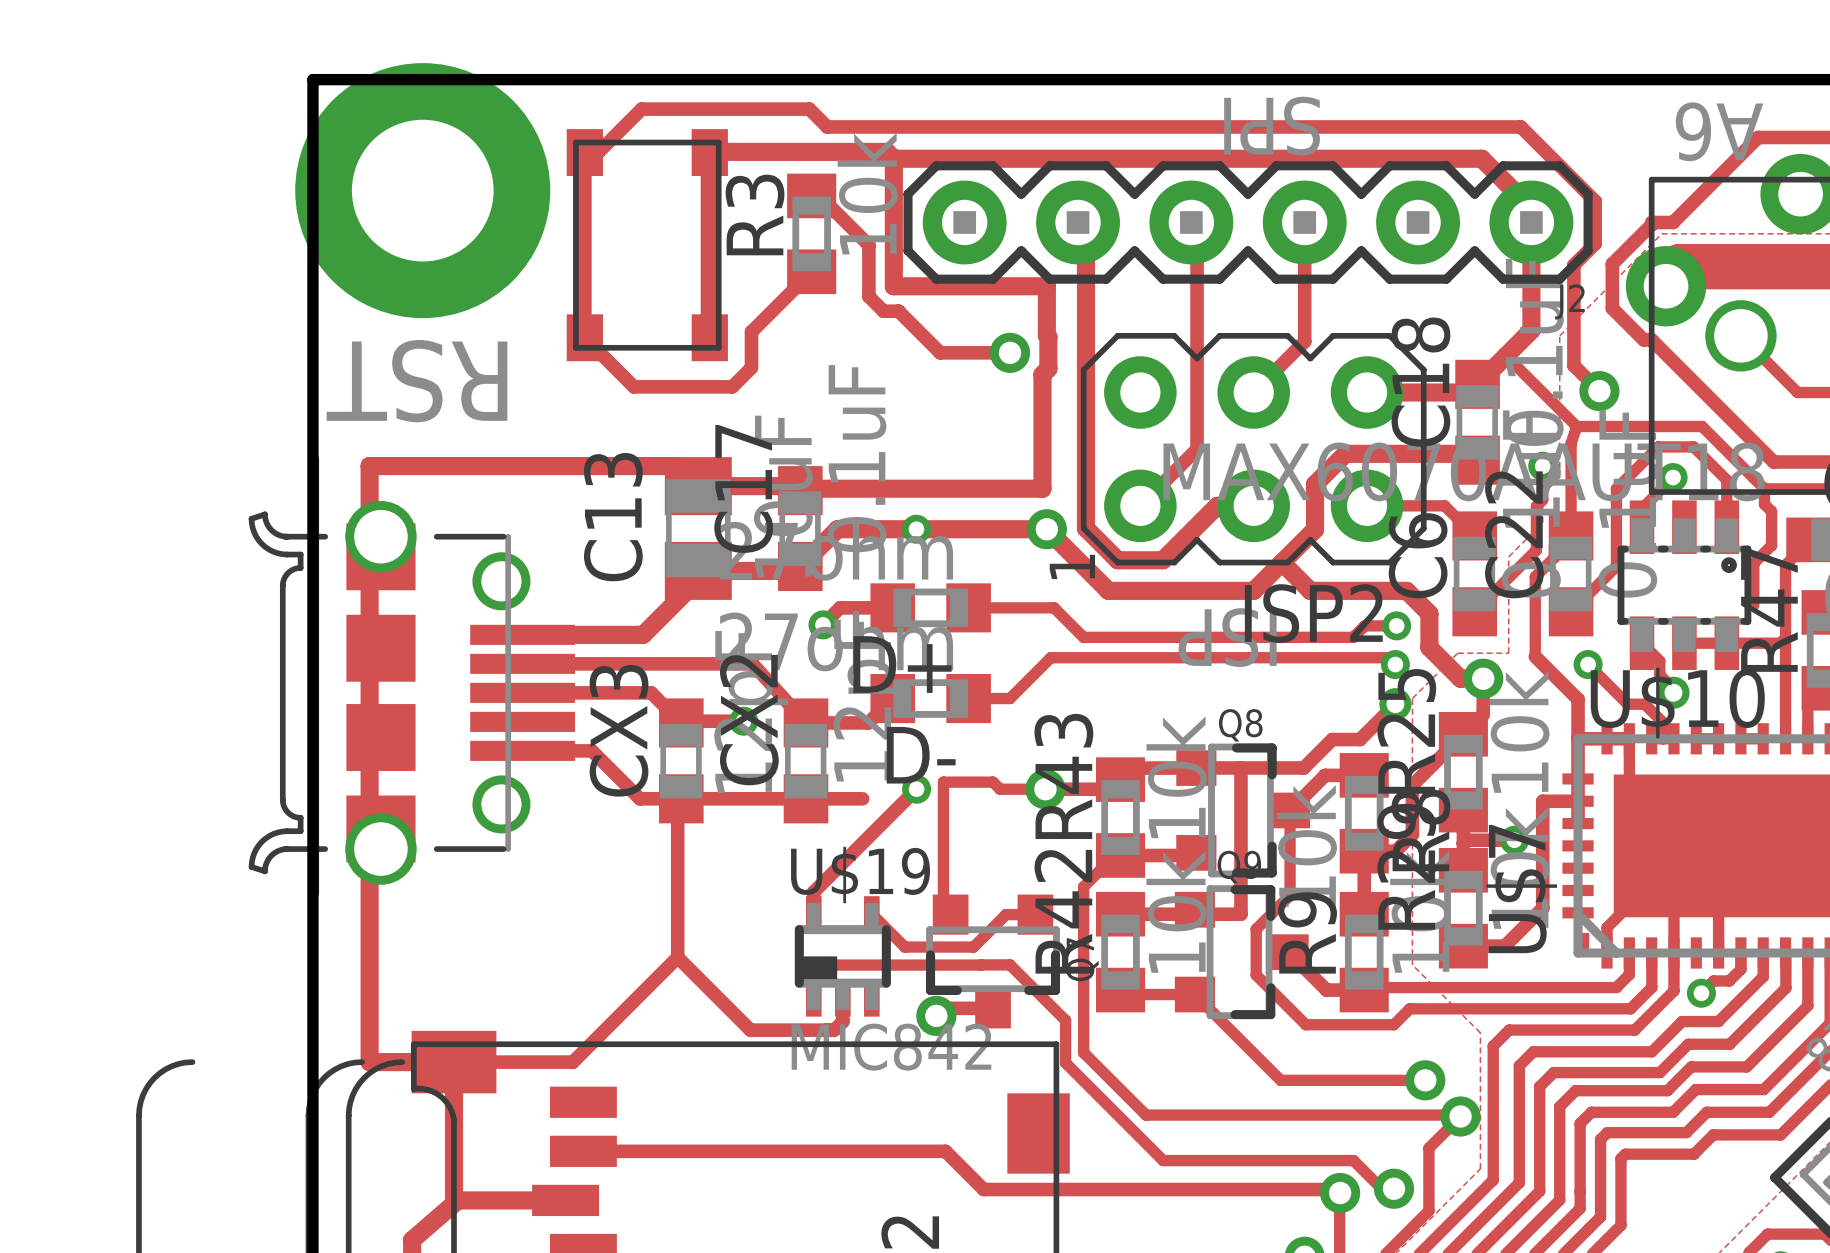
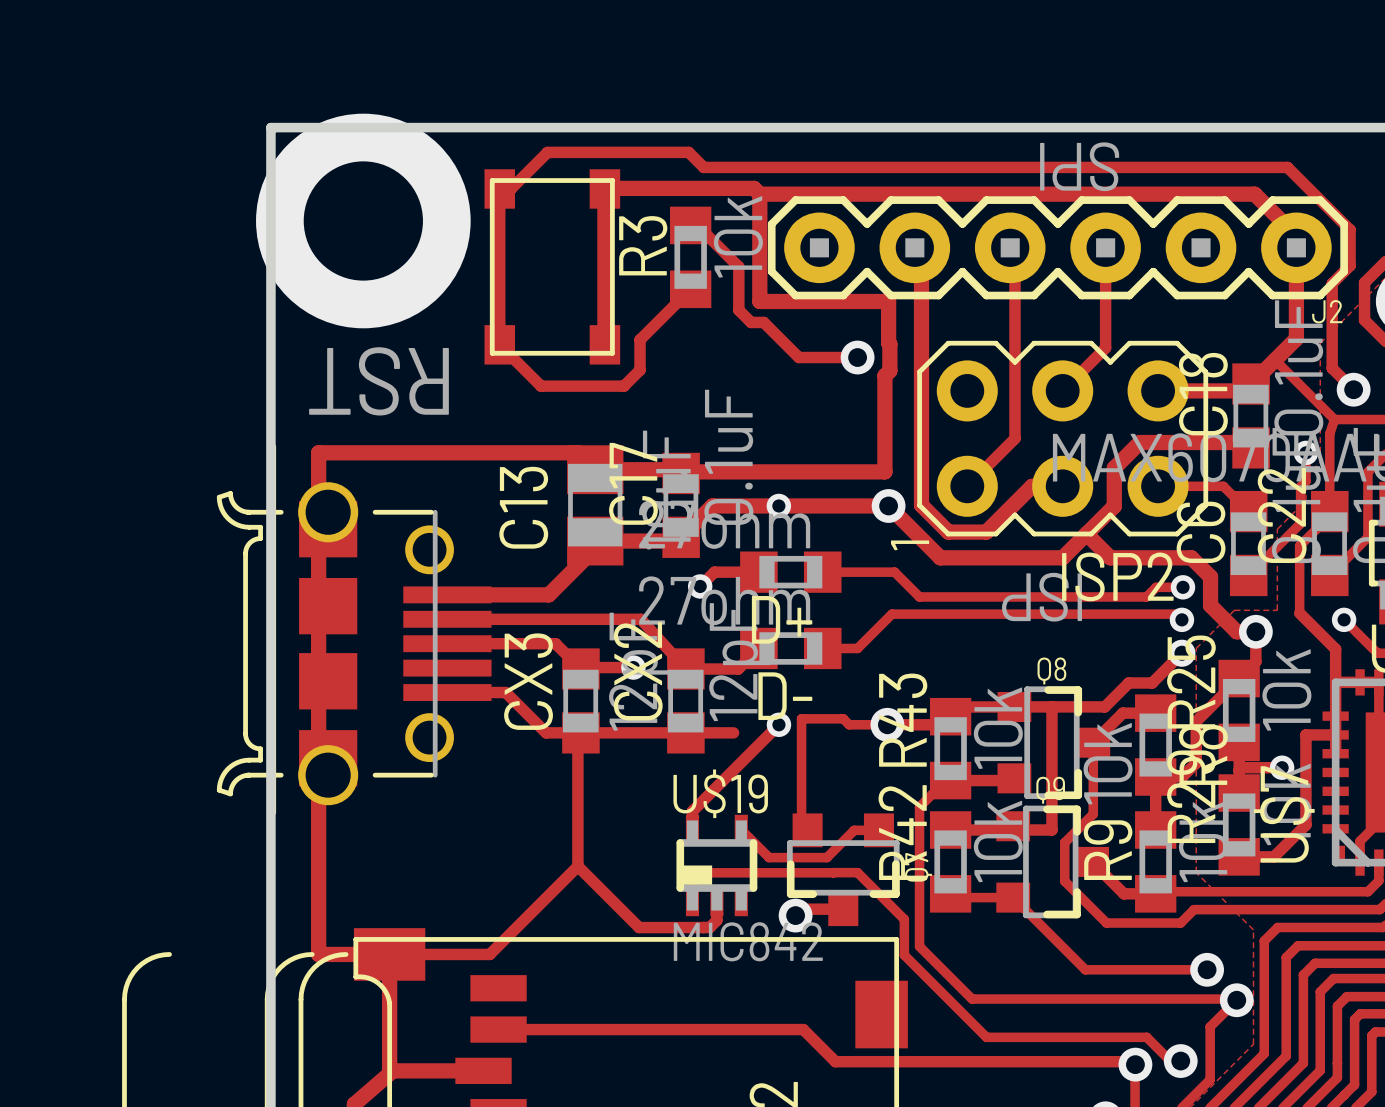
text position: RST (417, 381) -> RST (378, 381)

